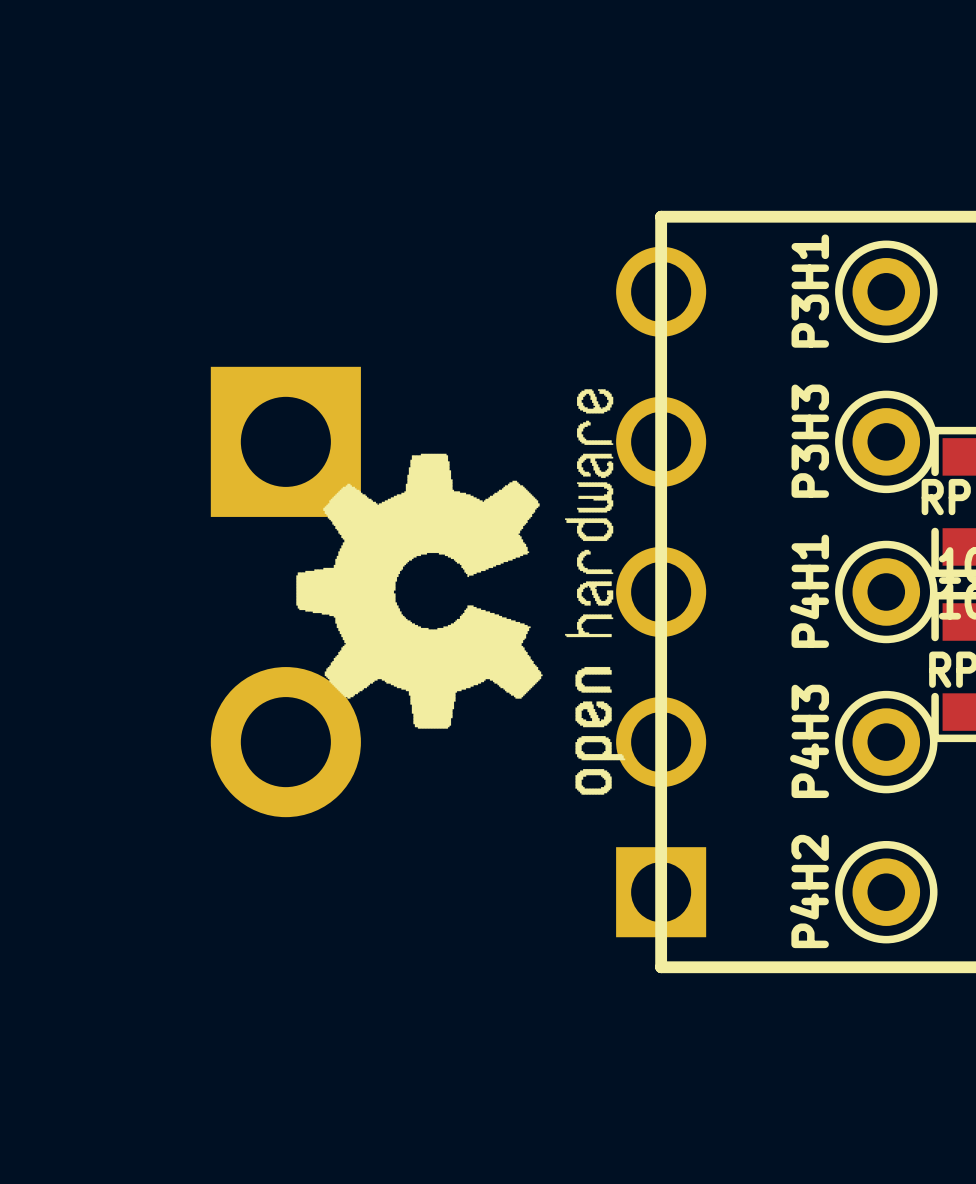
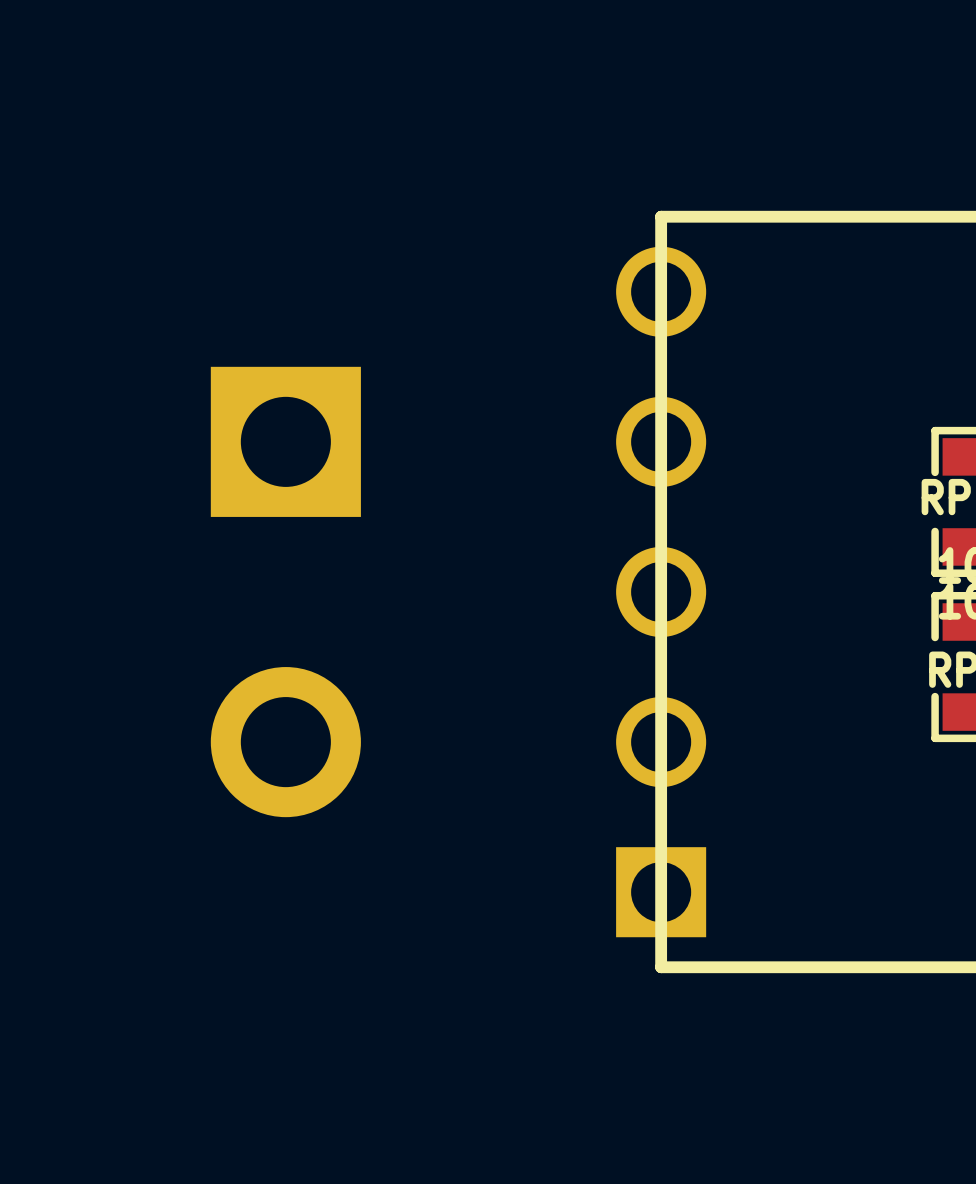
P3H1: (886, 291) -> none
drawing: [296, 389, 626, 795] -> none
P3H3: (886, 441) -> none
P4H1: (886, 591) -> none
P4H3: (886, 742) -> none
P4H2: (886, 892) -> none

